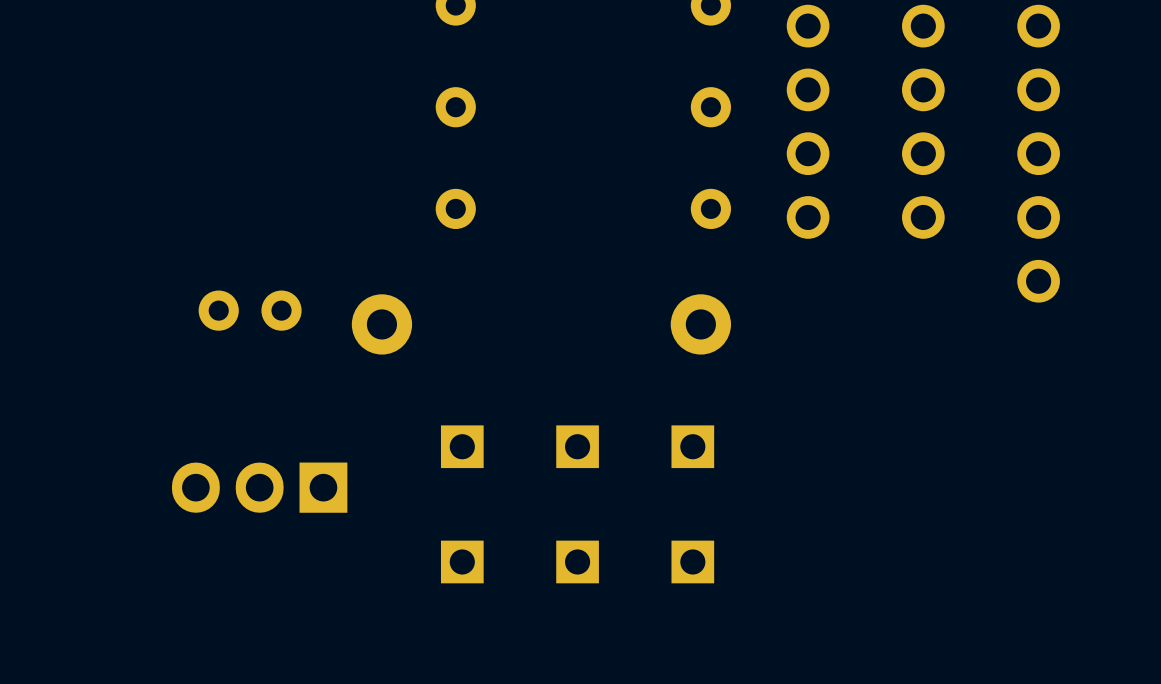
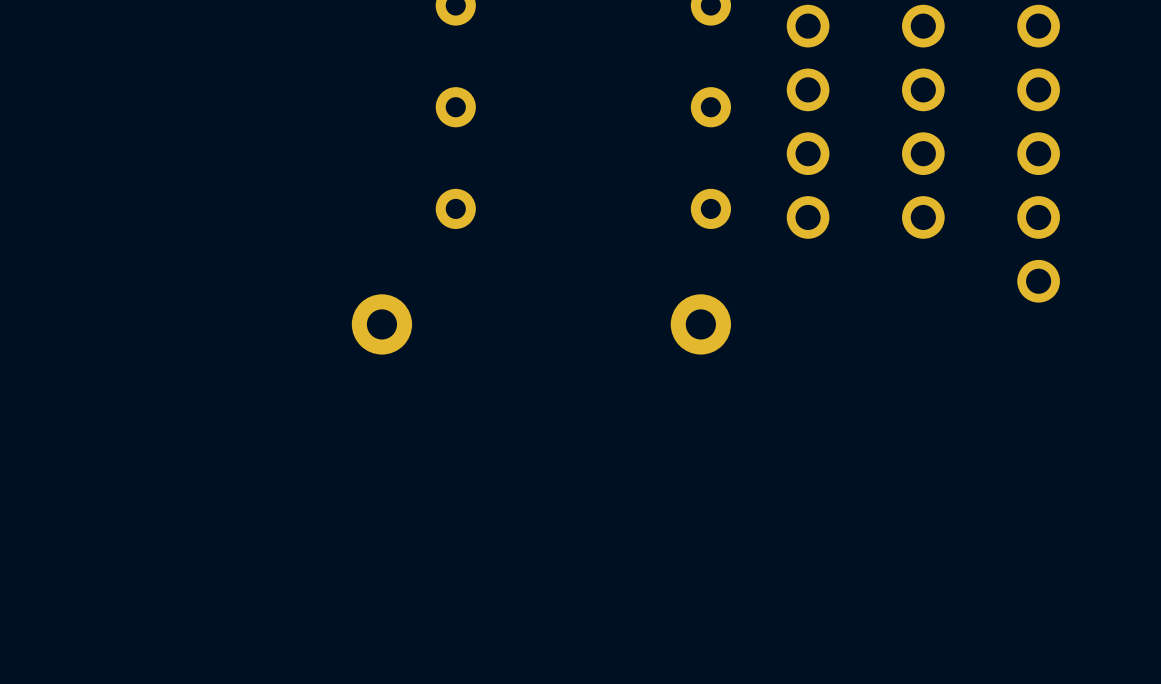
part: (250, 310) -> none
part: (462, 446) -> none
part: (577, 446) -> none
part: (692, 446) -> none
part: (259, 487) -> none
part: (462, 561) -> none
part: (577, 561) -> none
part: (692, 561) -> none

